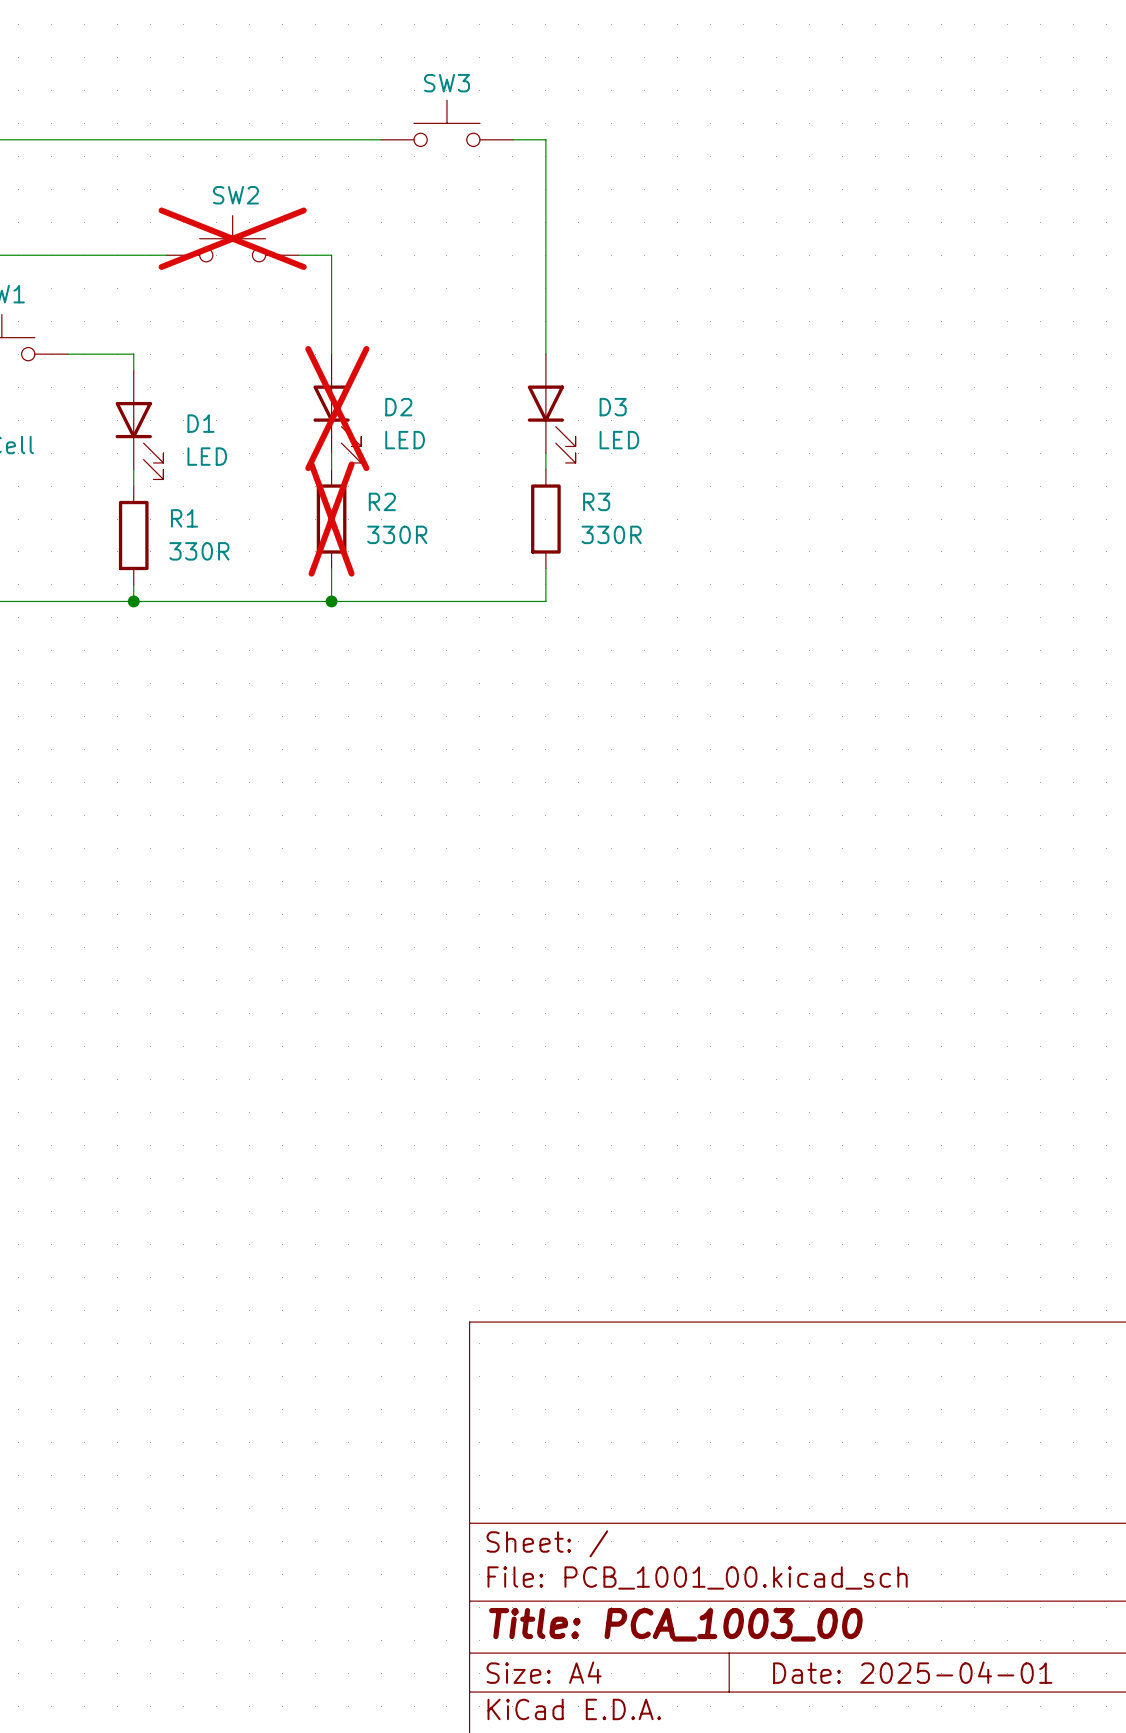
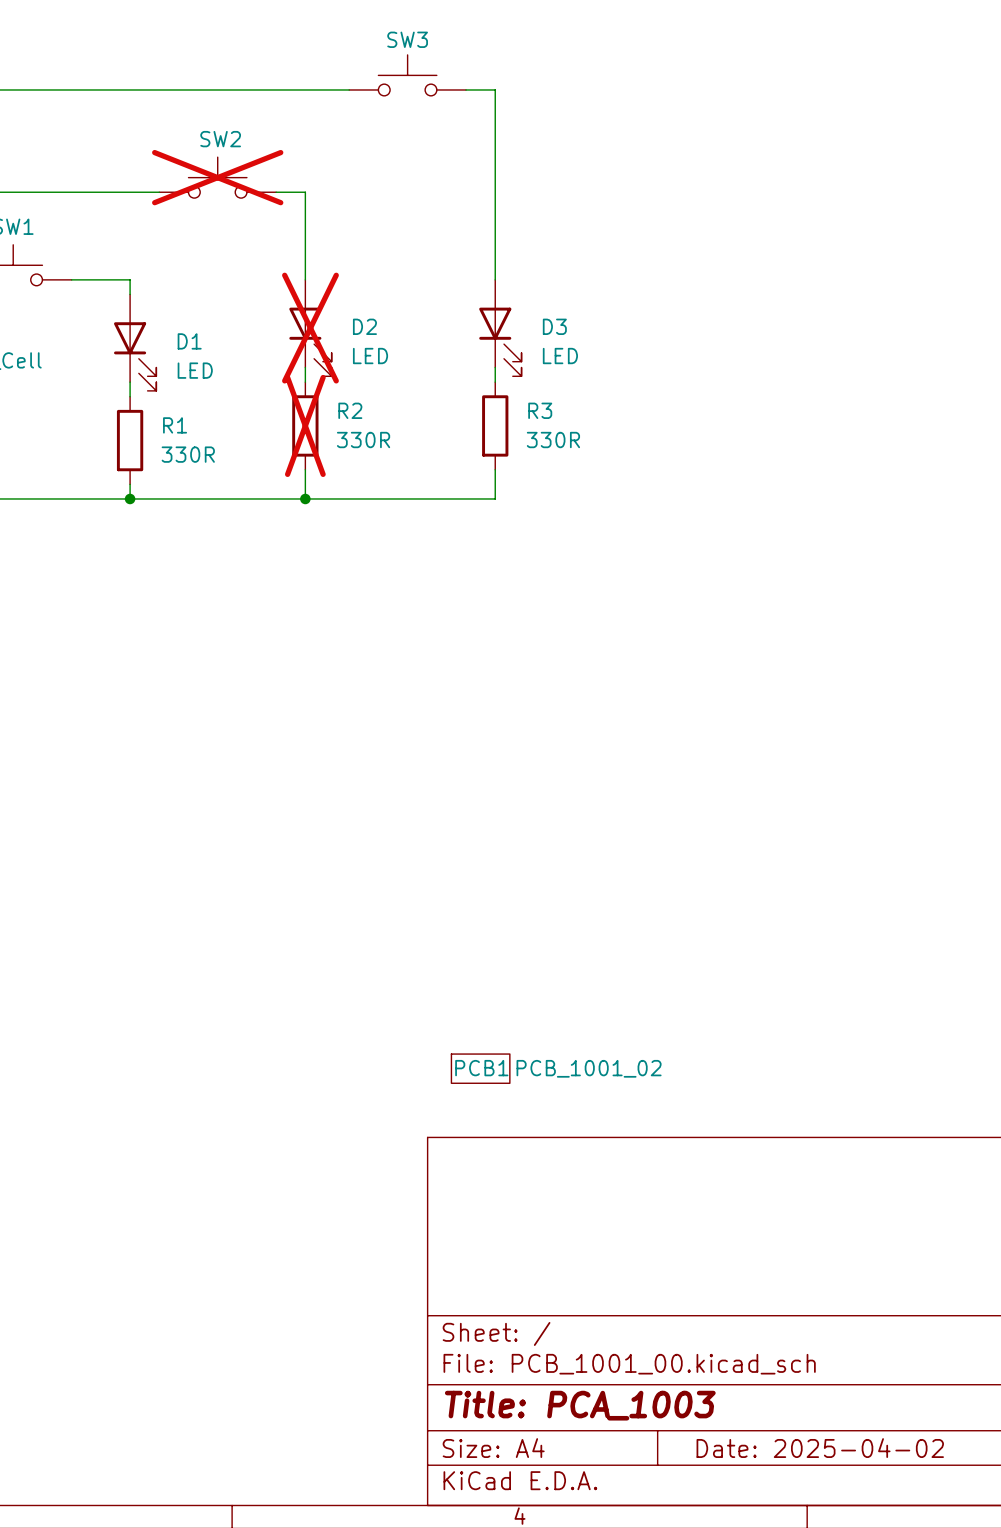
PCB1: none -> PCB_1001_02 (480, 1068)
title block: Title: PCA_1003_00 (675, 1624) -> Title: PCA_1003 (580, 1405)
title block: Date: 2025-04-01 (912, 1672) -> Date: 2025-04-02 (820, 1448)

